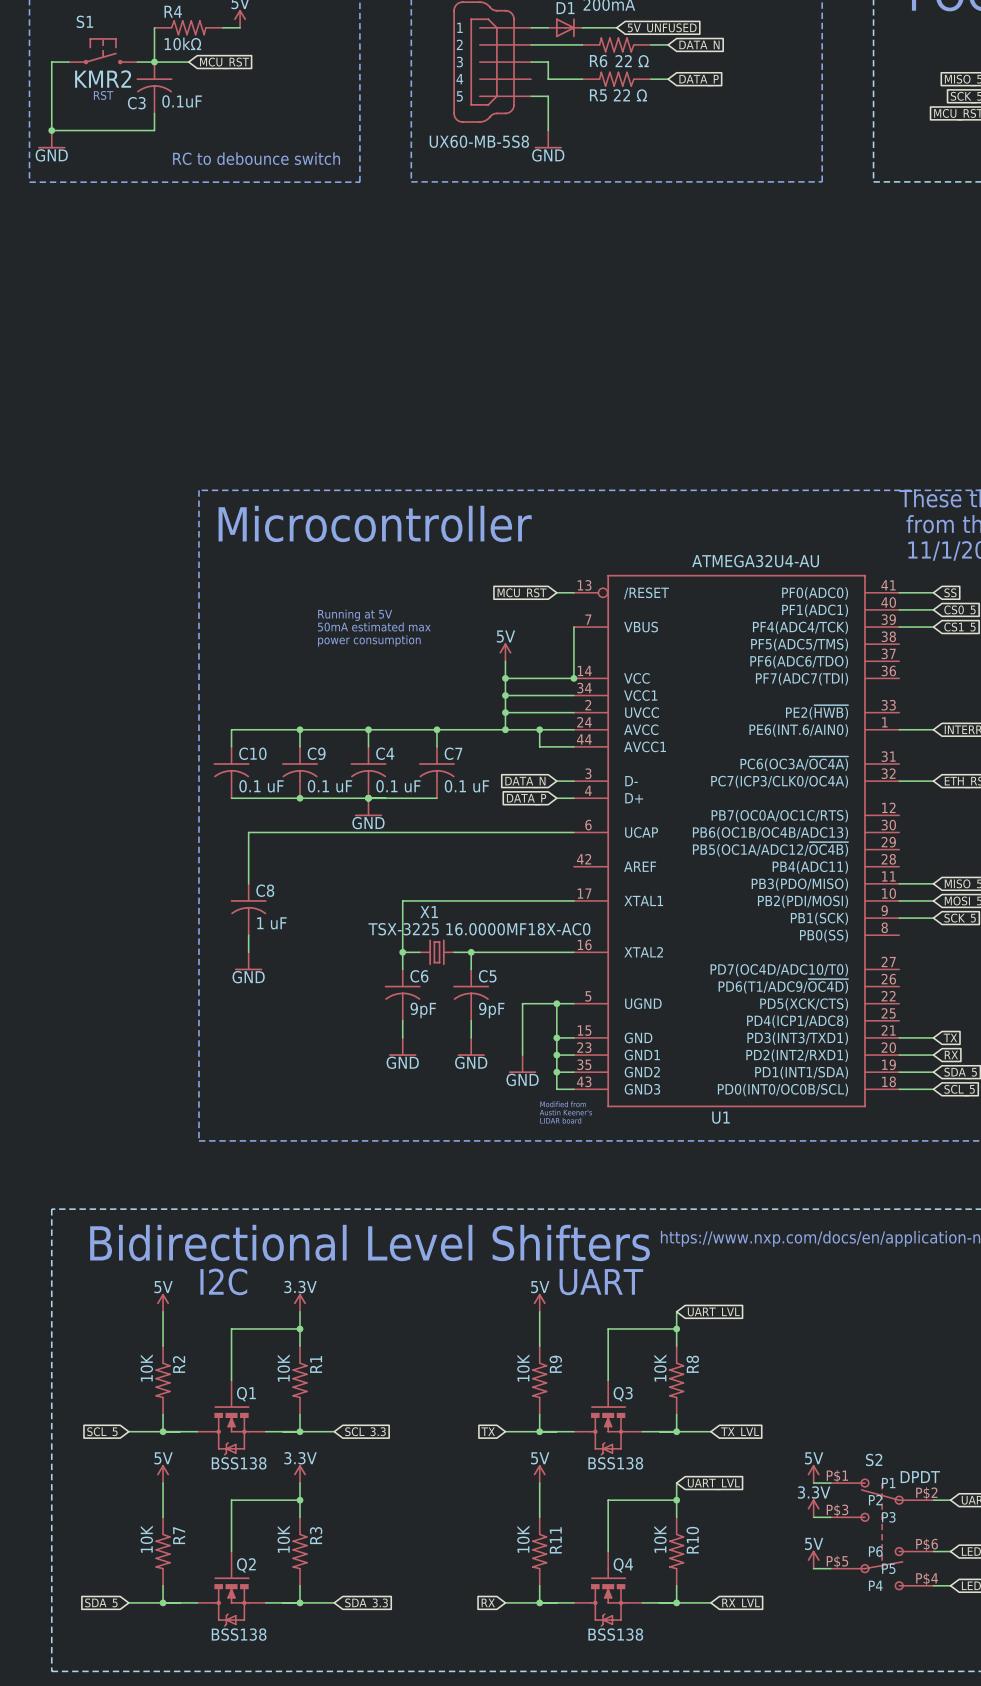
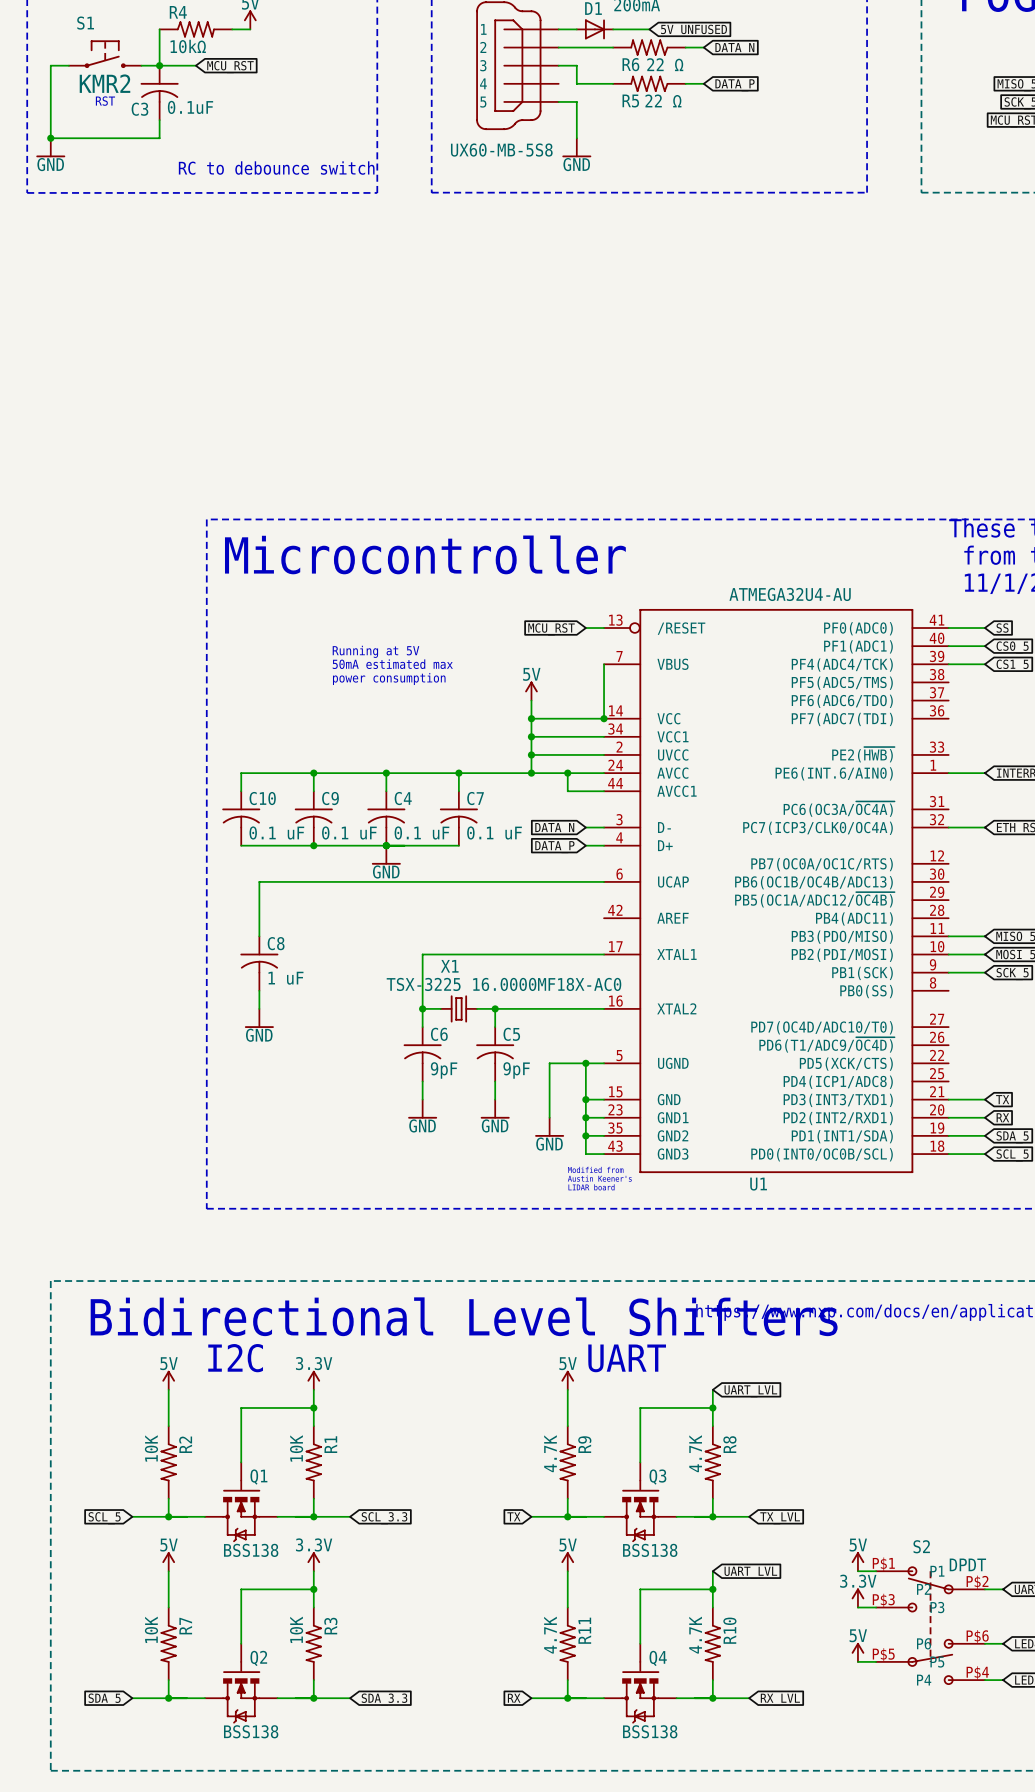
R9 value: 10K (523, 1367) -> 4.7K (550, 1453)
R8 value: 10K (660, 1367) -> 4.7K (695, 1453)
R11 value: 10K (523, 1539) -> 4.7K (550, 1635)
R10 value: 10K (660, 1539) -> 4.7K (695, 1635)

